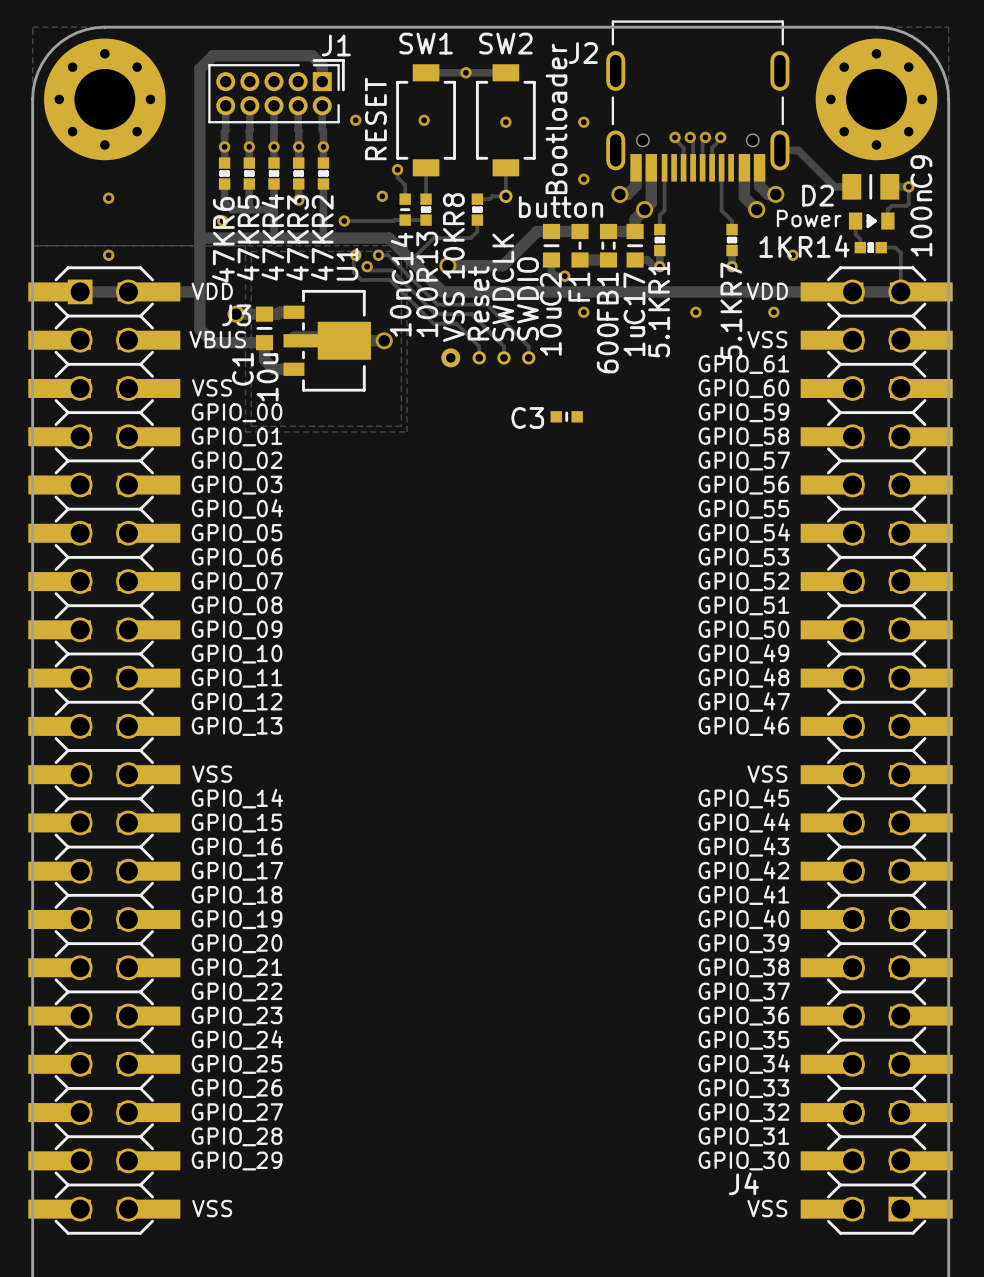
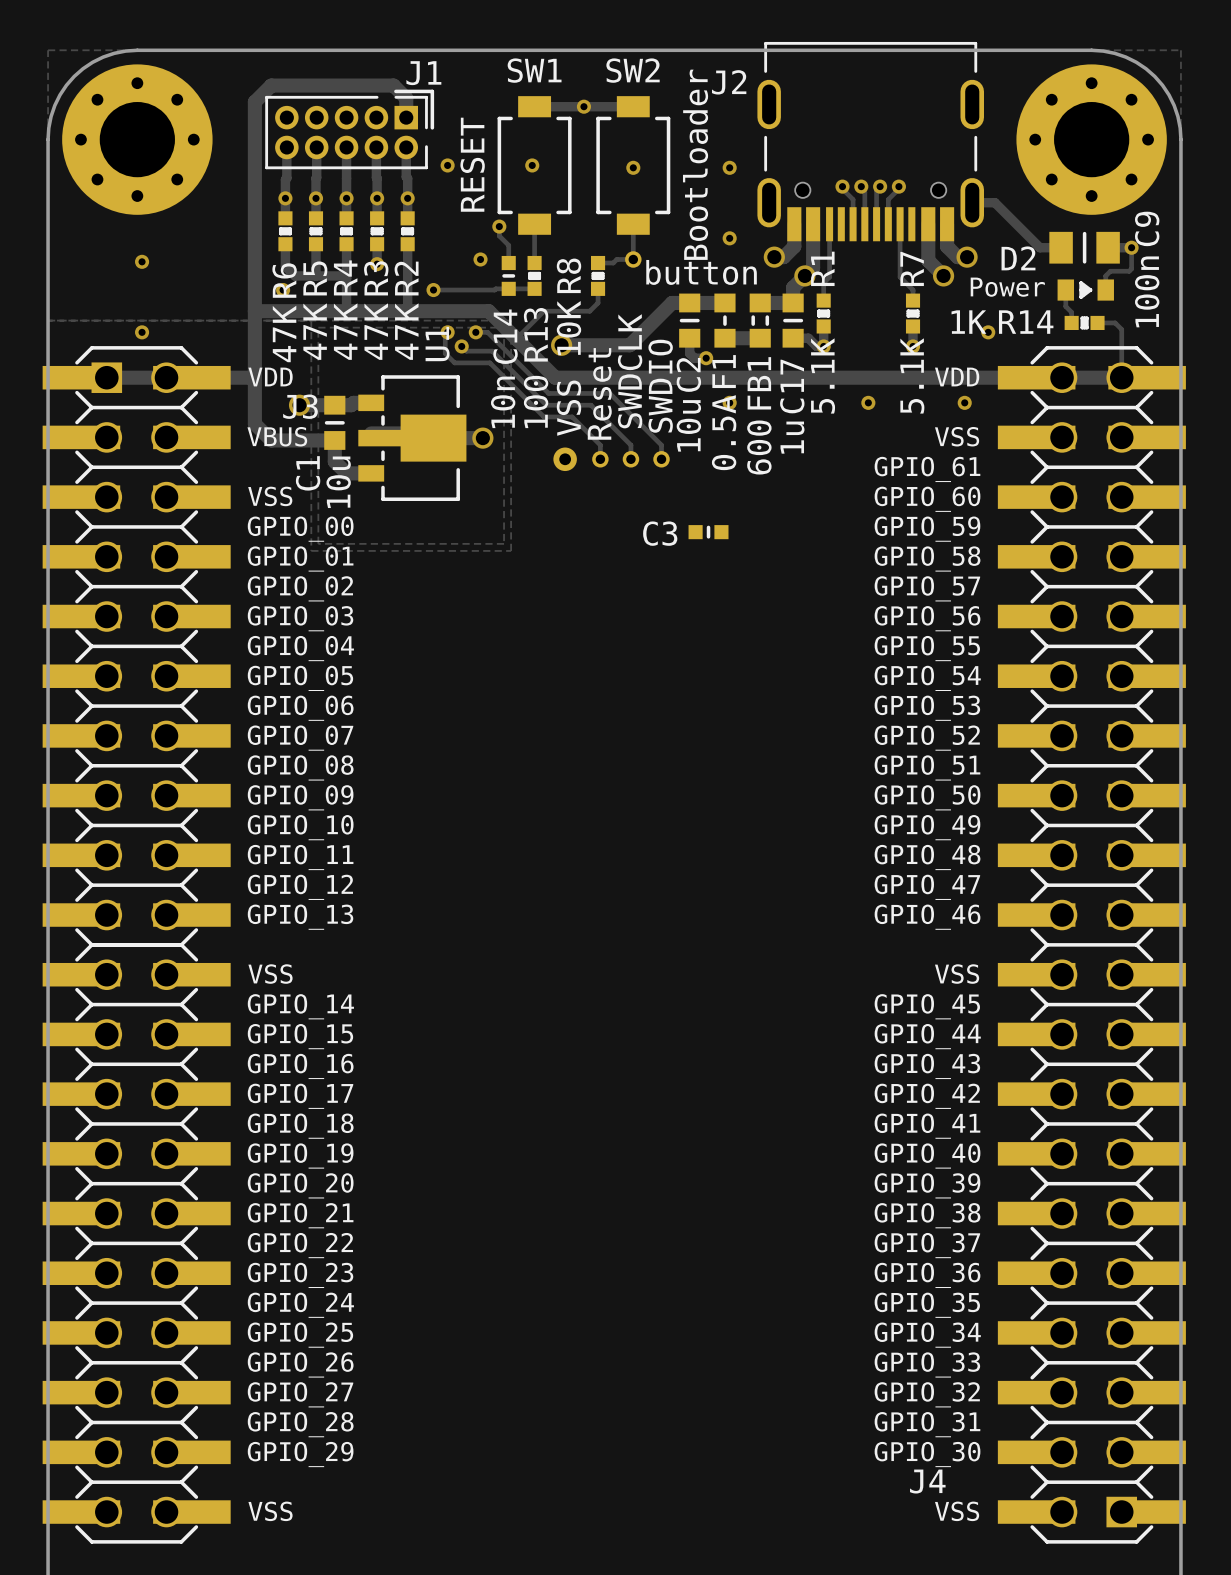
R1 name position: R1 (659, 277) -> R1 (822, 268)
R7 name position: R7 (731, 279) -> R7 (912, 268)
R1 value position: 5.1K (659, 327) -> 5.1K (823, 375)
R7 value position: 5.1K (731, 329) -> 5.1K (912, 375)
F1 value: none -> 0.5A (724, 432)

